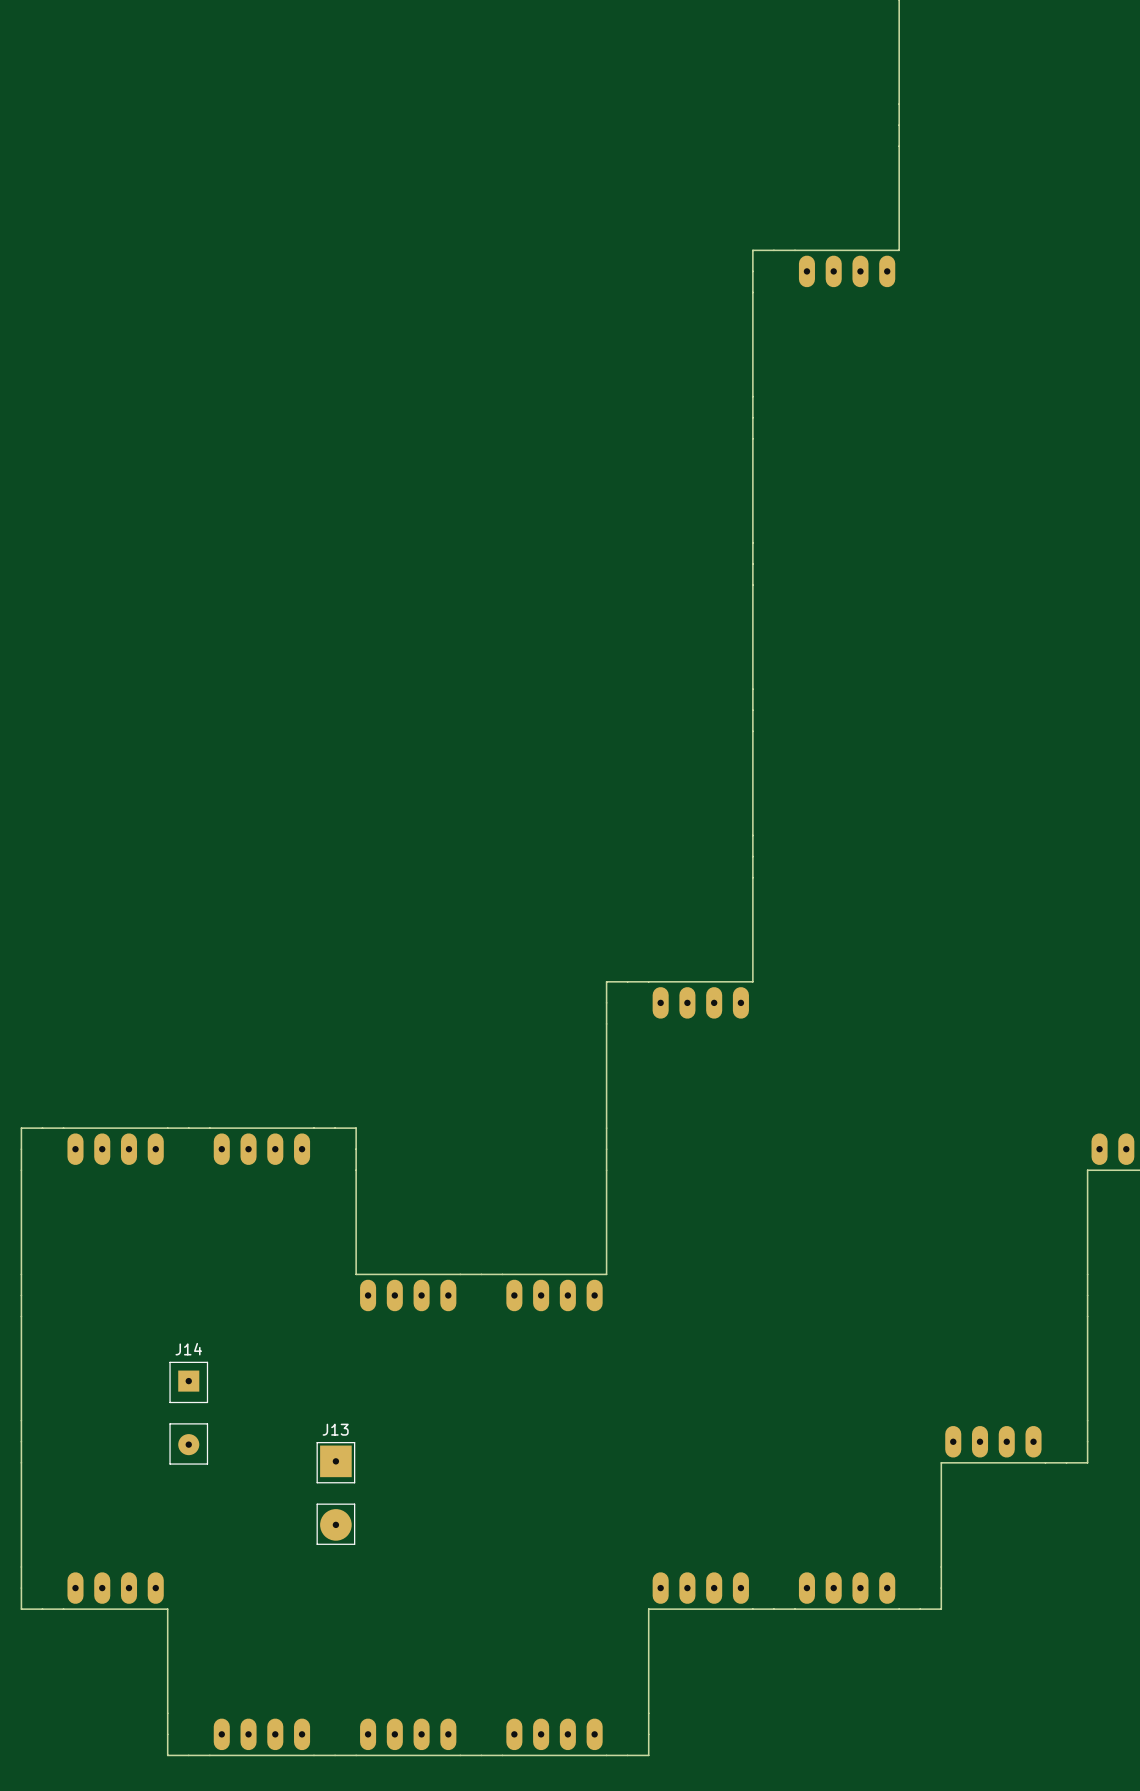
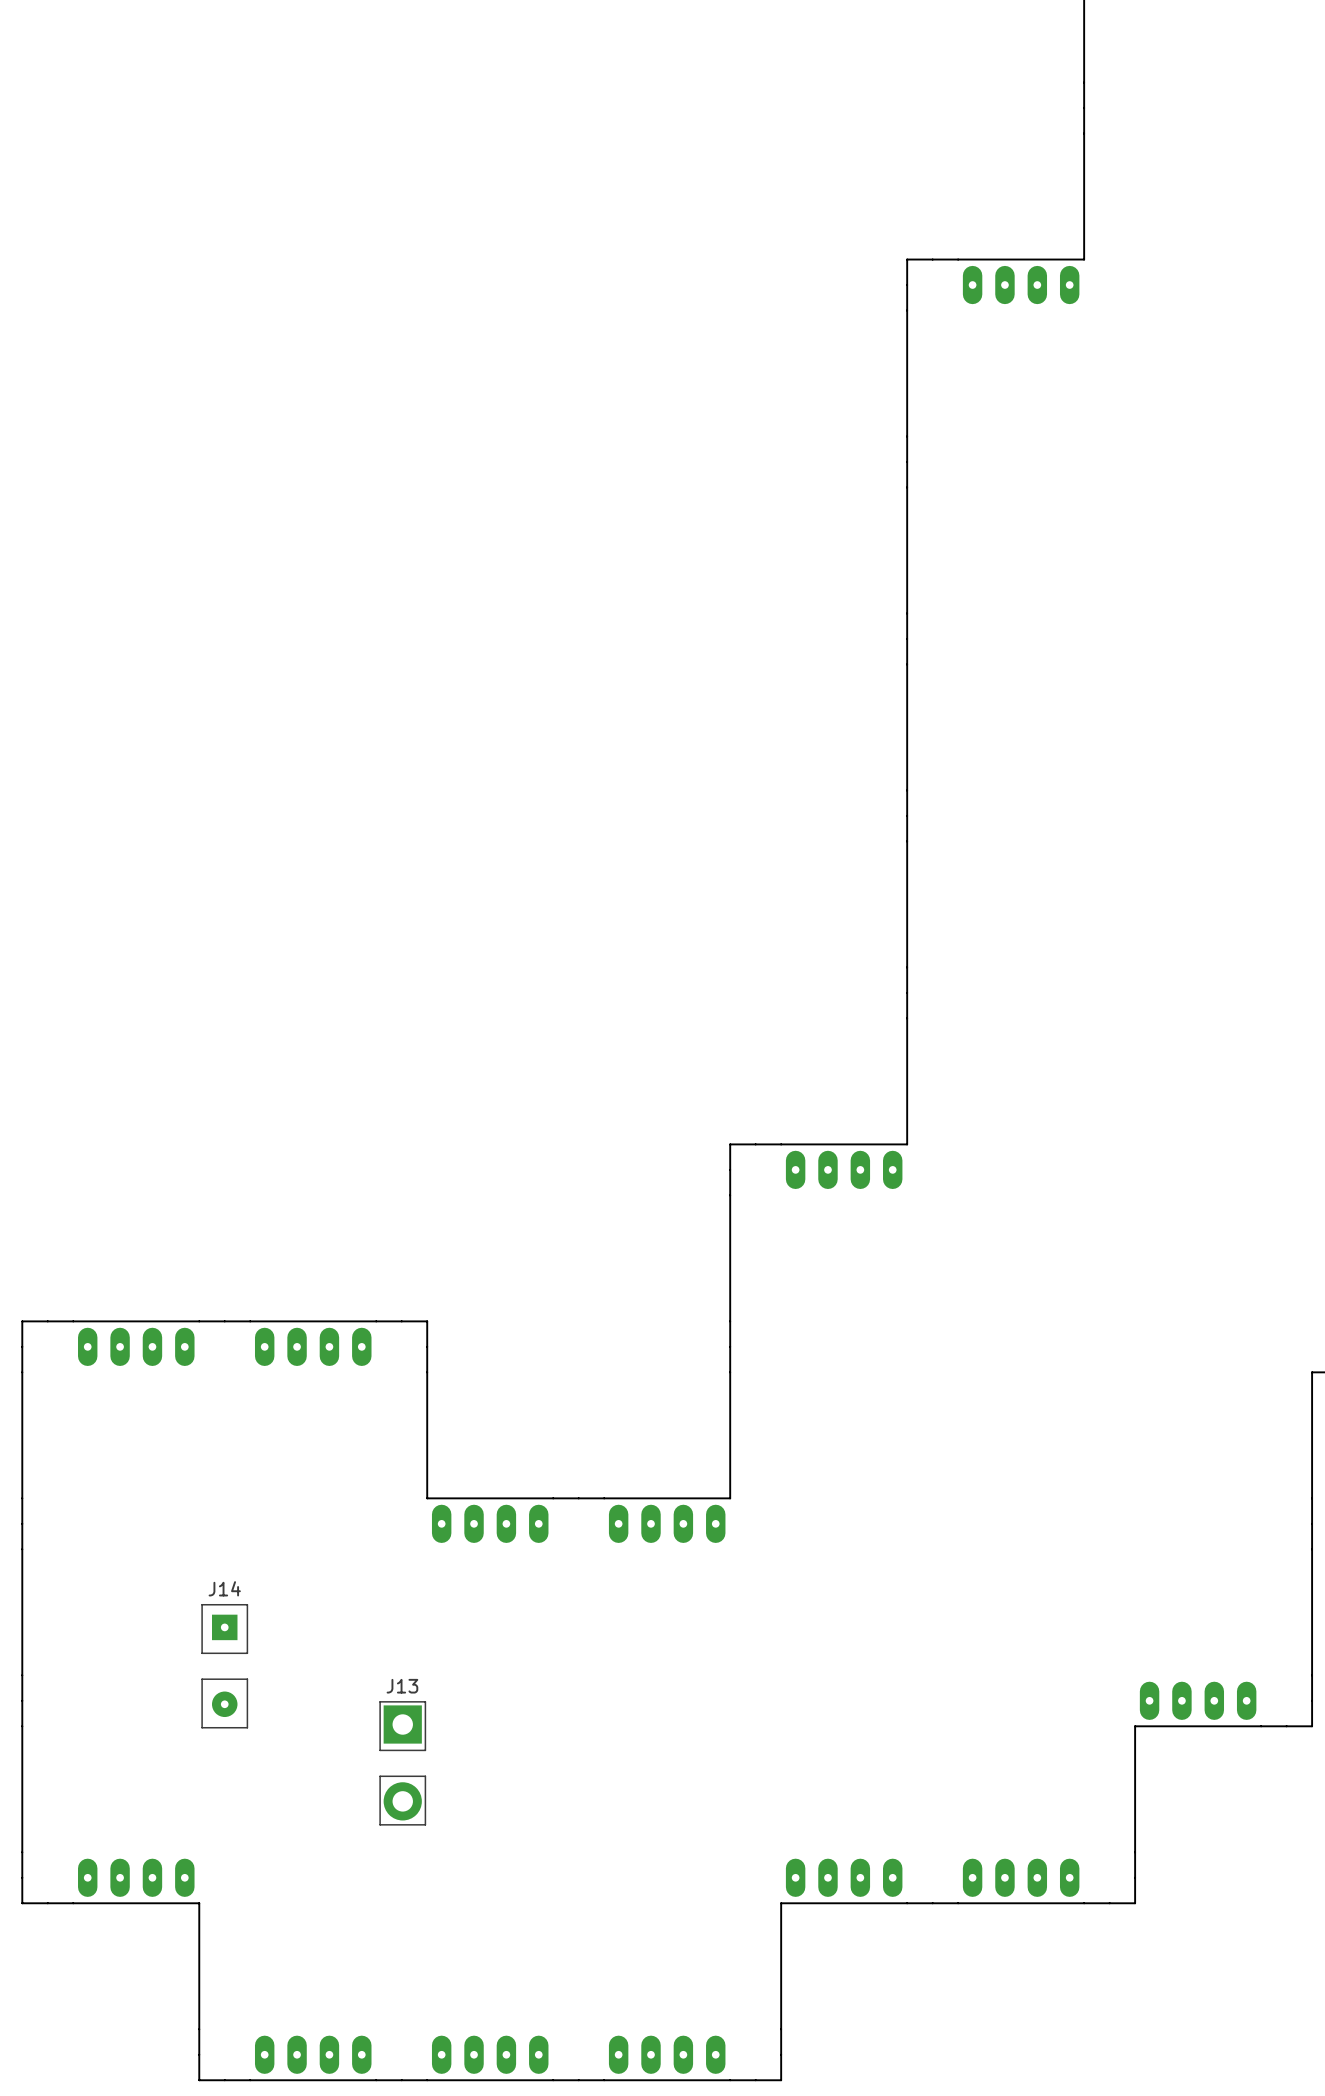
J13 footprint: [316, 1441, 356, 1545] -> [379, 1701, 427, 1826]

